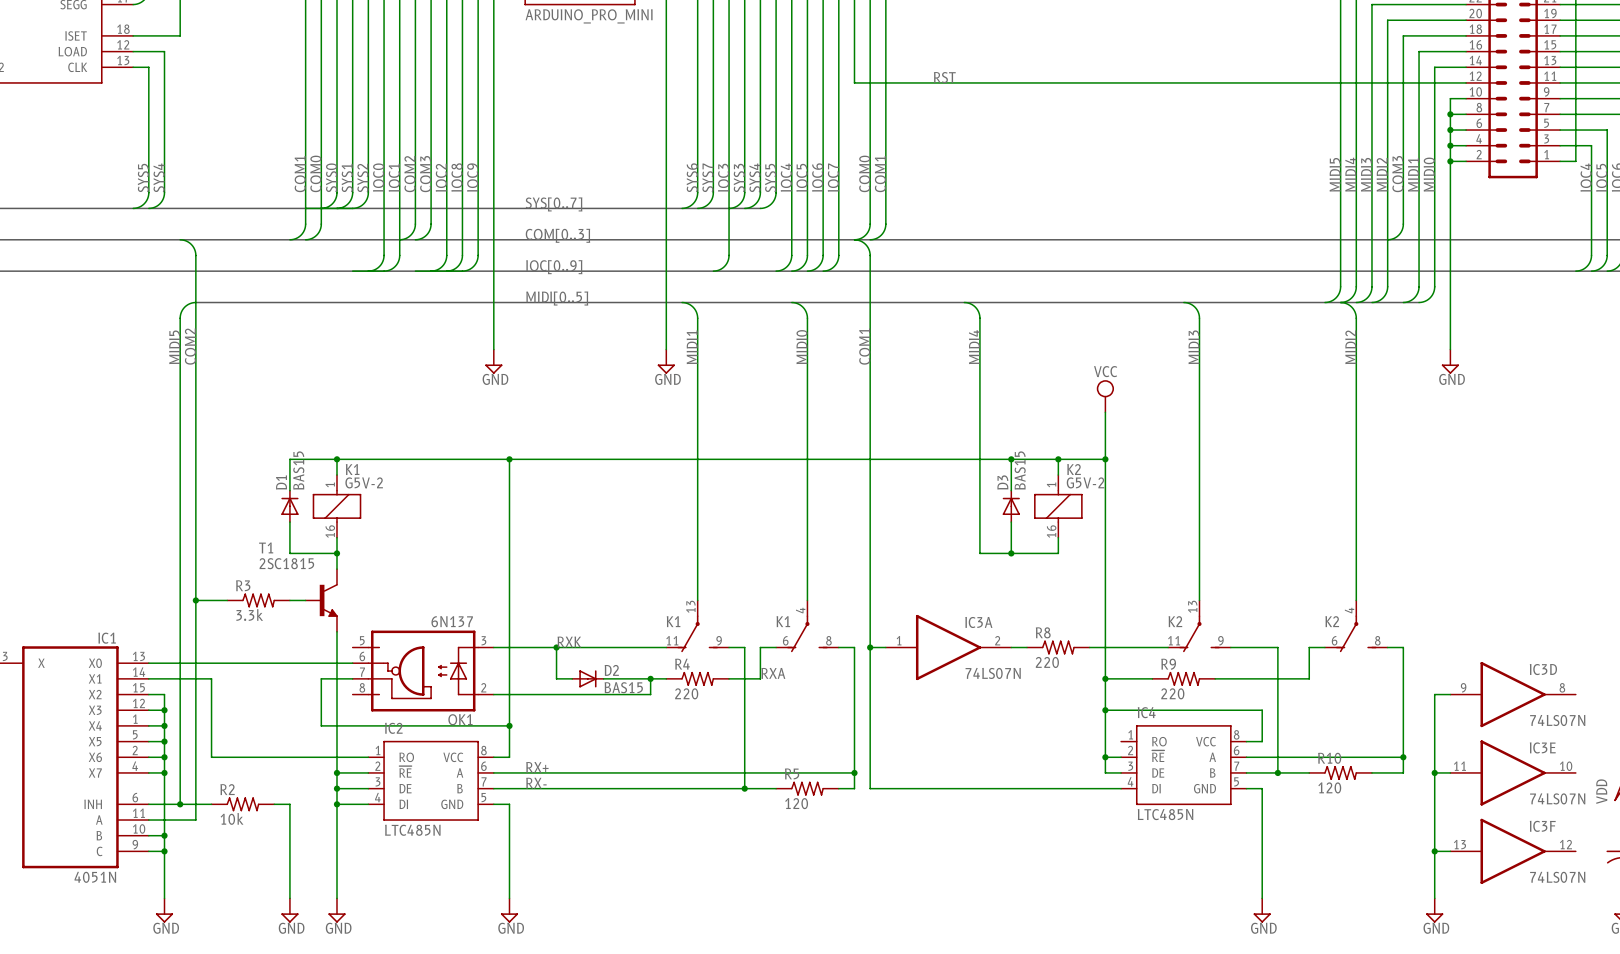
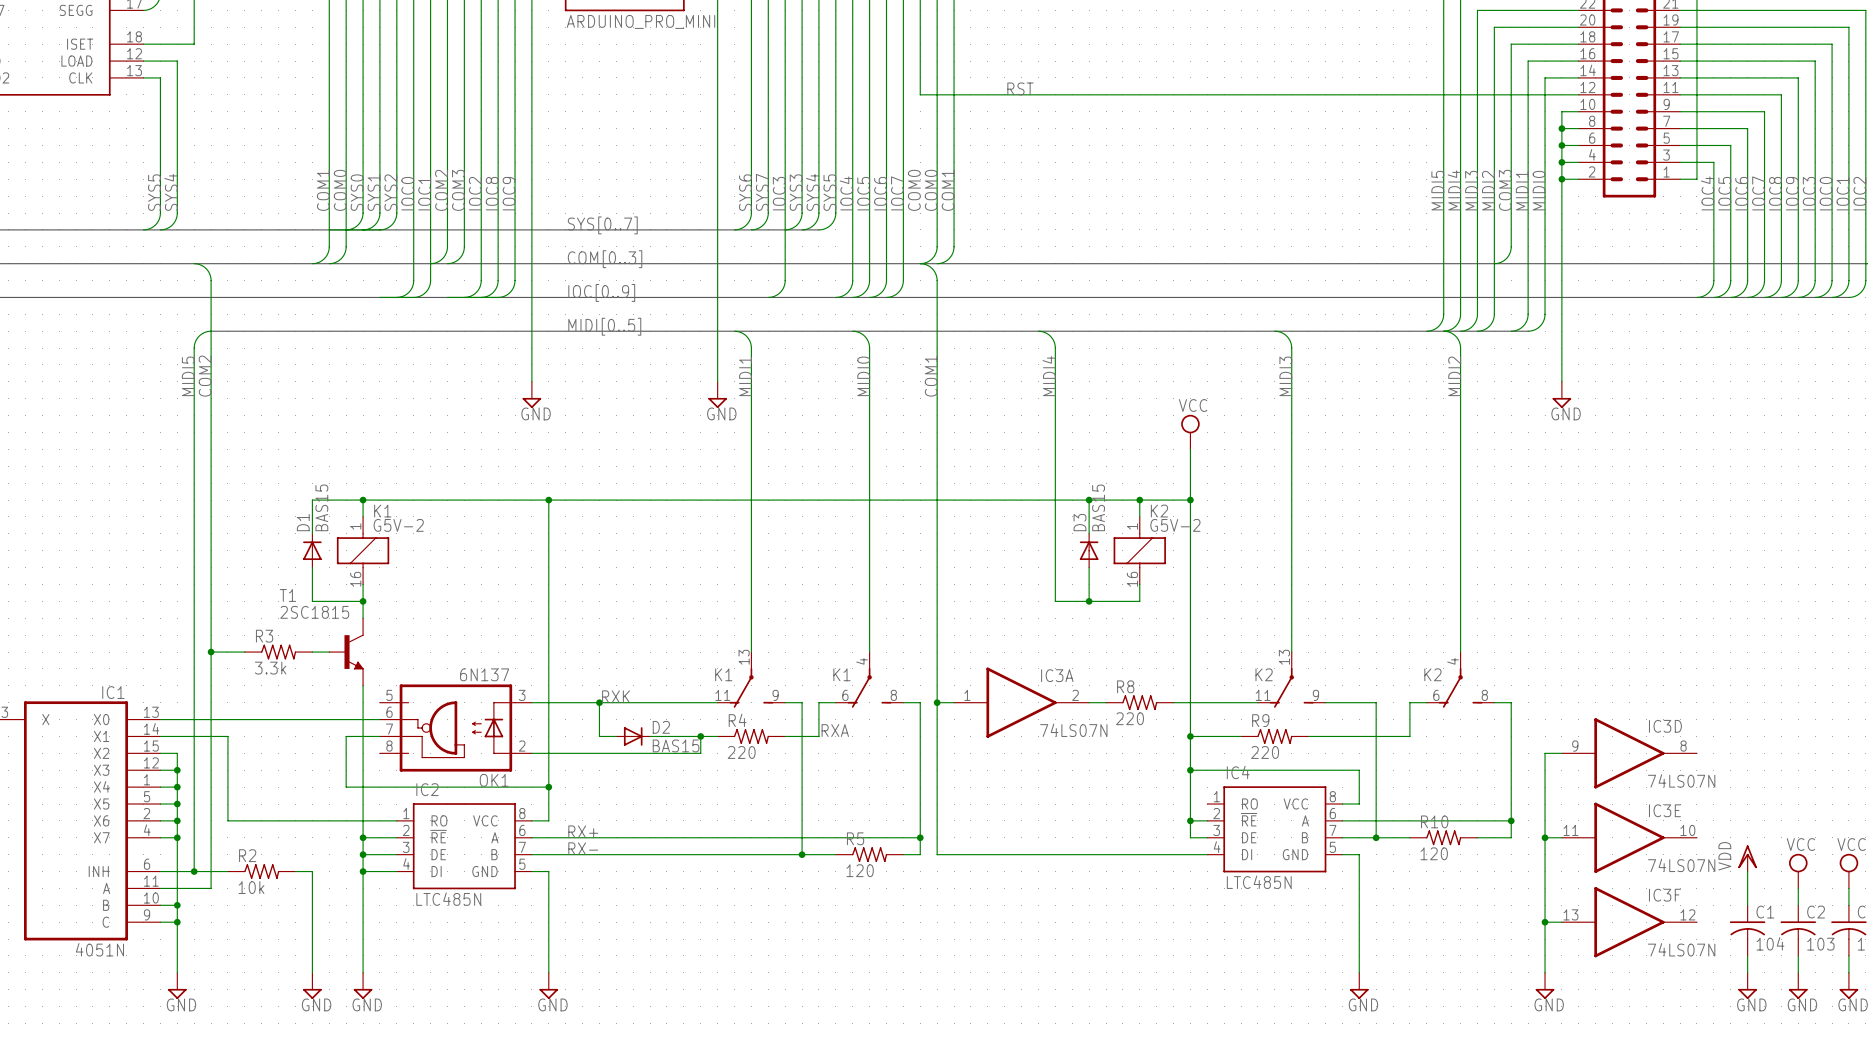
label: none -> COM0 (914, 190)

